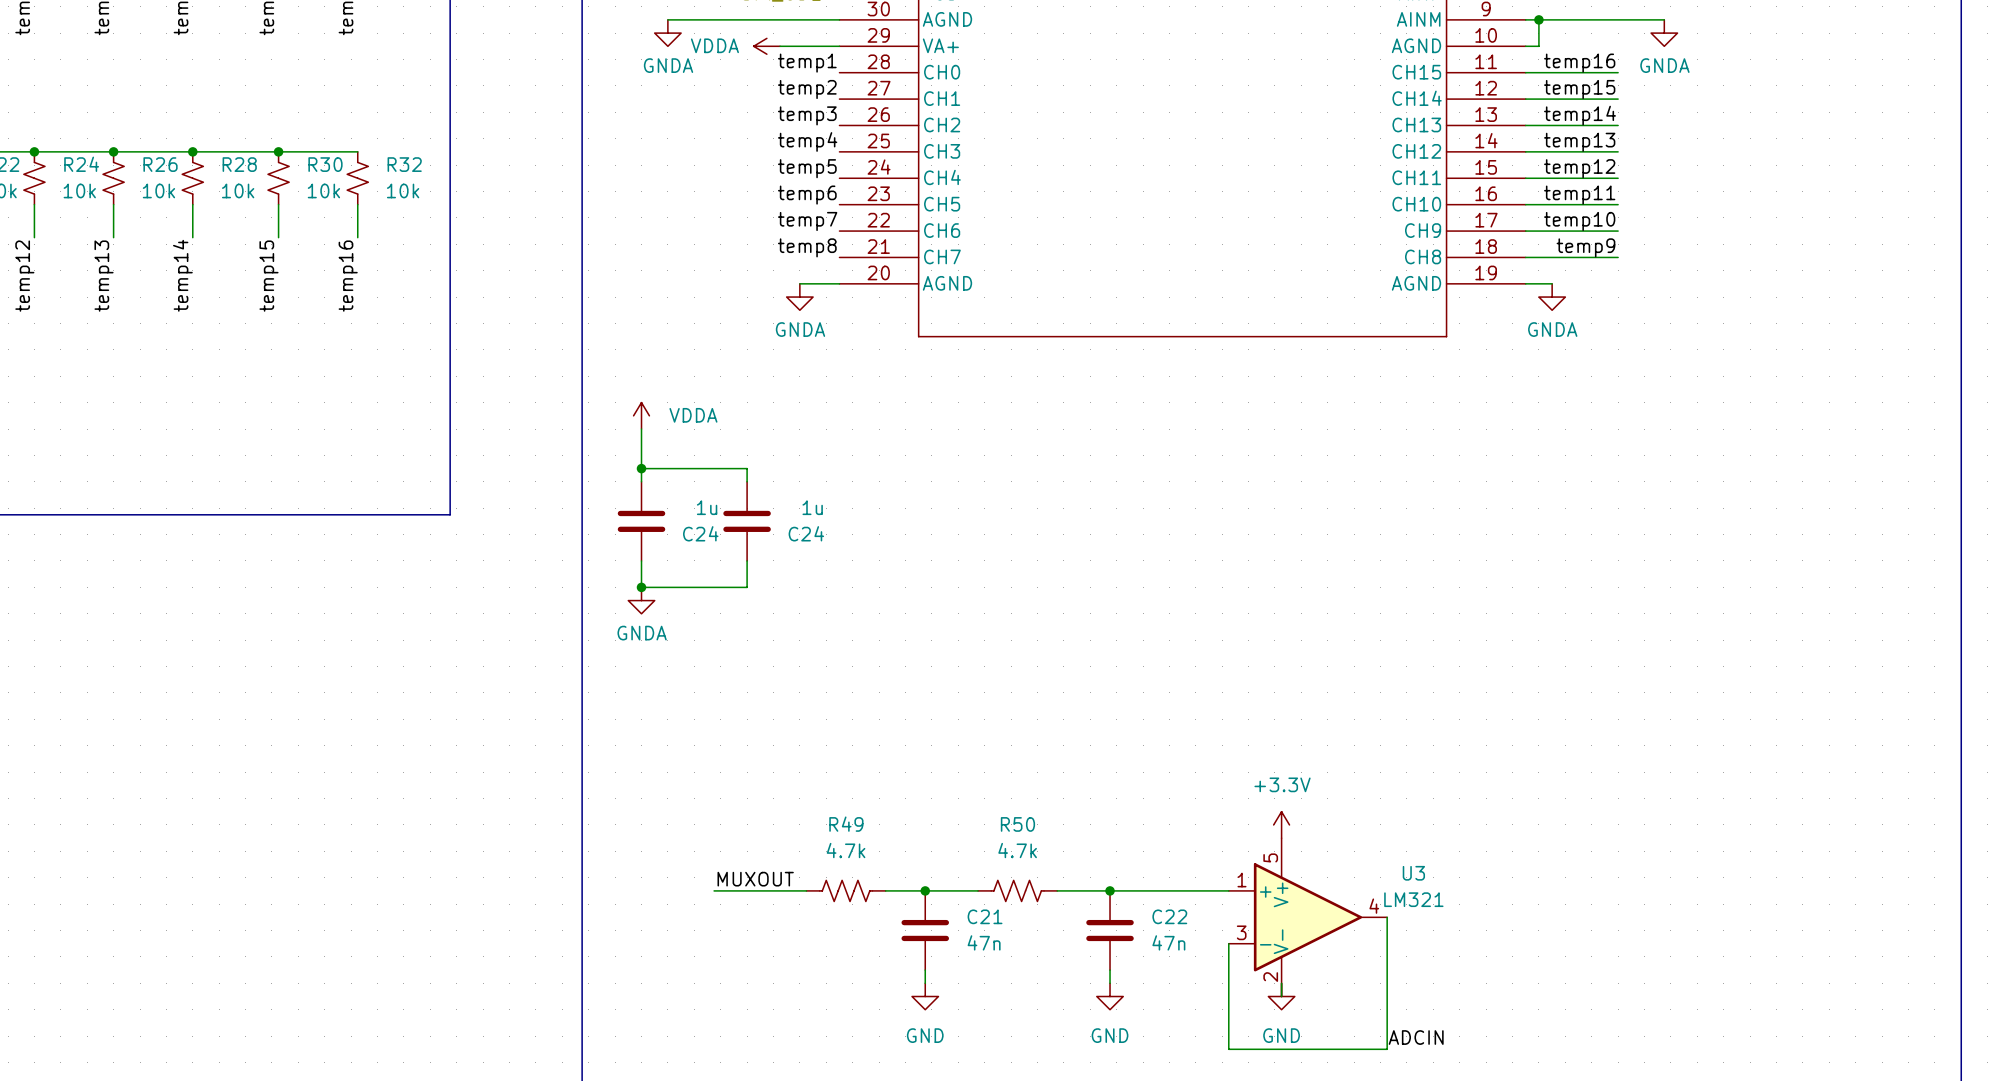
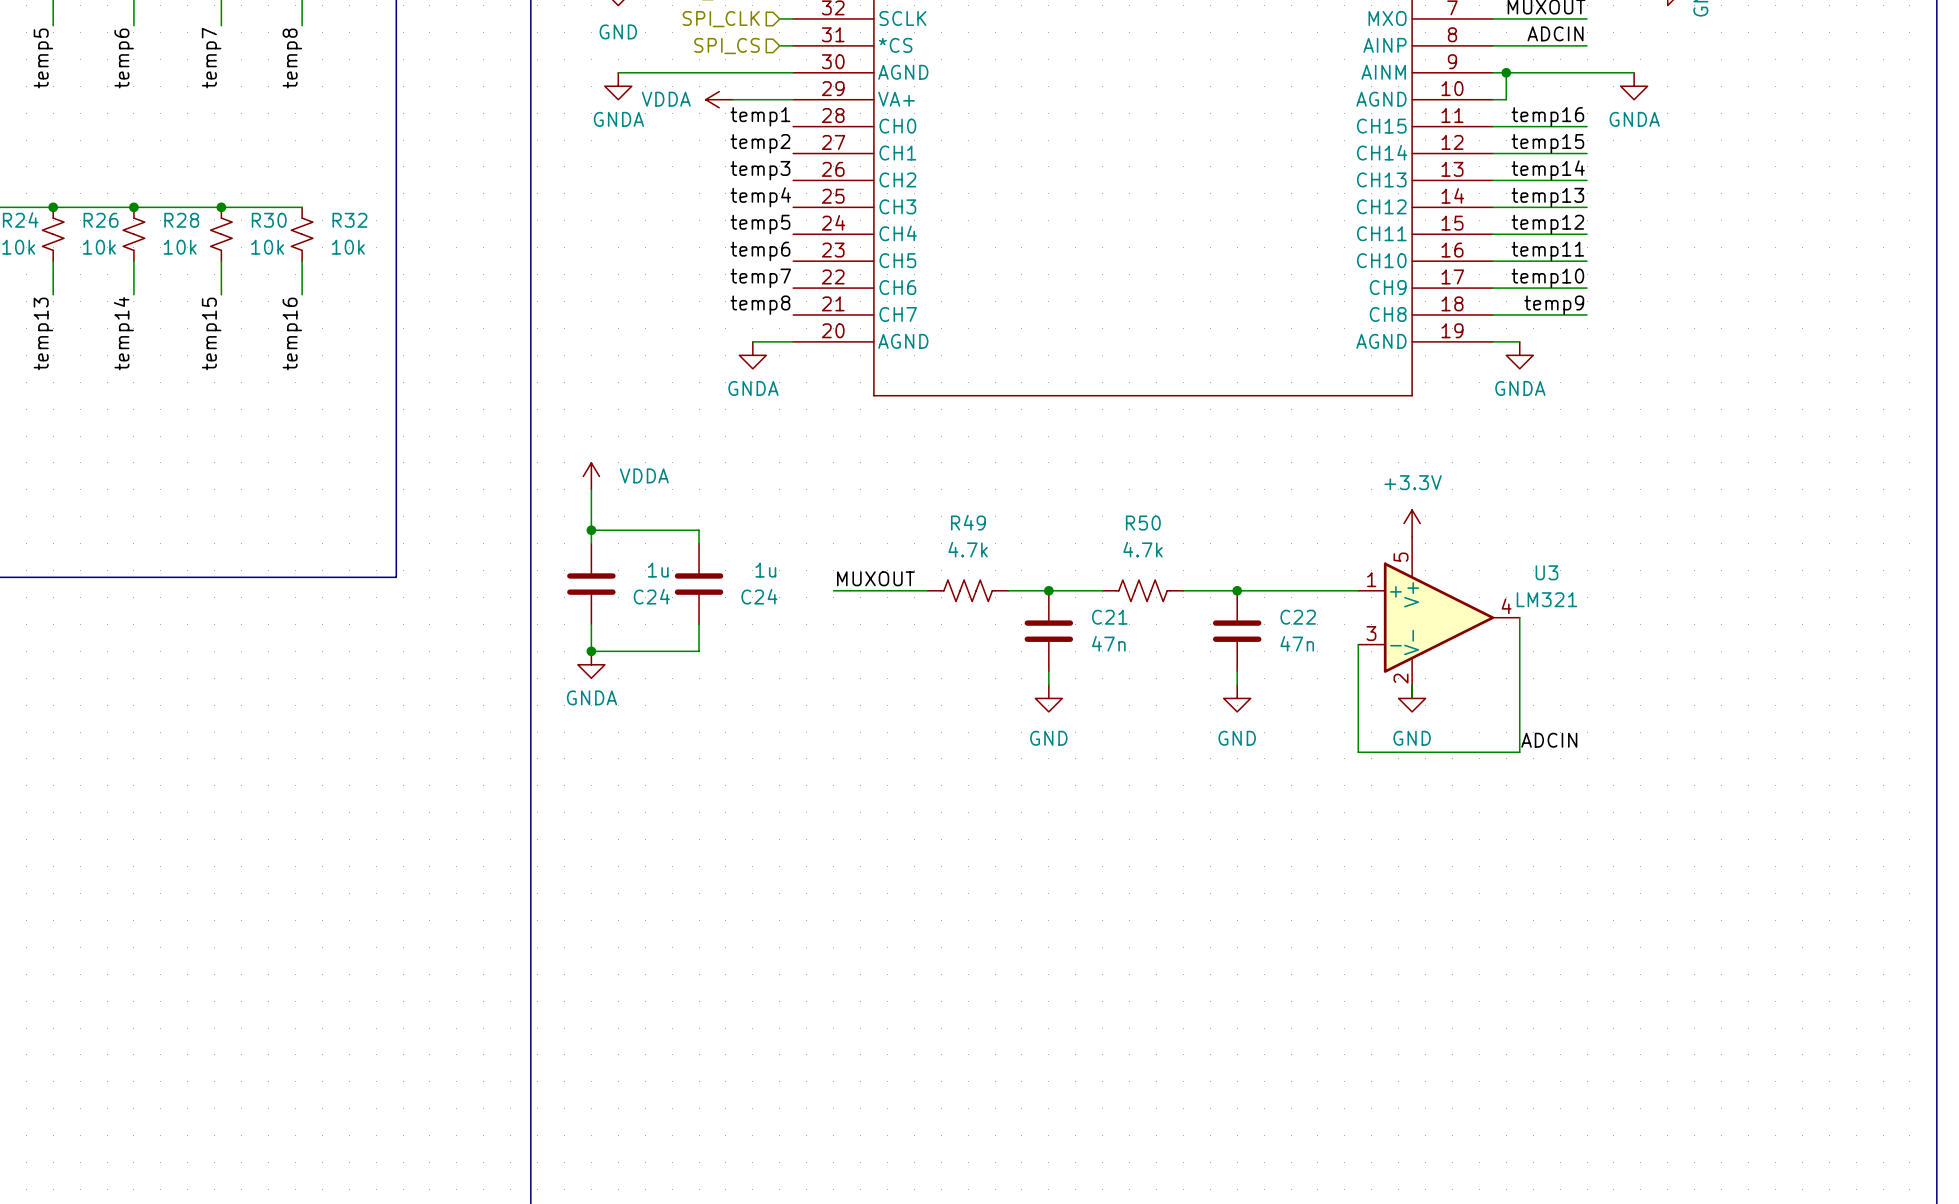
power symbol: none -> +3.3V (1412, 523)
label: none -> MUXOUT (875, 578)
wire: none -> (833, 590) (927, 590)
wire: none -> (1008, 590) (1102, 590)
junction: none -> (1048, 590)
wire: none -> (1183, 590) (1358, 590)
junction: none -> (1237, 590)
wire: none -> (1519, 617) (1519, 752) (1358, 752) (1358, 644)
wire: none -> (1048, 671) (1048, 684)
wire: none -> (1237, 671) (1237, 684)
wire: none -> (1412, 684) (1412, 698)
power symbol: none -> GND (1048, 698)
power symbol: none -> GND (1237, 698)
power symbol: none -> GND (1412, 698)
label: none -> ADCIN (1549, 740)
power symbol: +3.3V (1281, 824) -> none
label: MUXOUT (755, 879) -> none
wire: (714, 890) (806, 890) -> none
R49 position: (846, 890) -> (968, 590)
wire: (885, 890) (978, 890) -> none
junction: (925, 890) -> none
R50 position: (1017, 890) -> (1143, 590)
wire: (1057, 890) (1228, 890) -> none
junction: (1110, 890) -> none
U3 position: (1307, 917) -> (1439, 617)
wire: (1387, 917) (1387, 1049) (1228, 1049) (1228, 943) -> none
C21 position: (925, 930) -> (1048, 631)
C22 position: (1110, 930) -> (1237, 631)
wire: (925, 970) (925, 983) -> none
wire: (1110, 970) (1110, 983) -> none
wire: (1281, 983) (1281, 996) -> none
power symbol: GND (925, 996) -> none
power symbol: GND (1110, 996) -> none
power symbol: GND (1281, 996) -> none
label: ADCIN (1416, 1037) -> none

